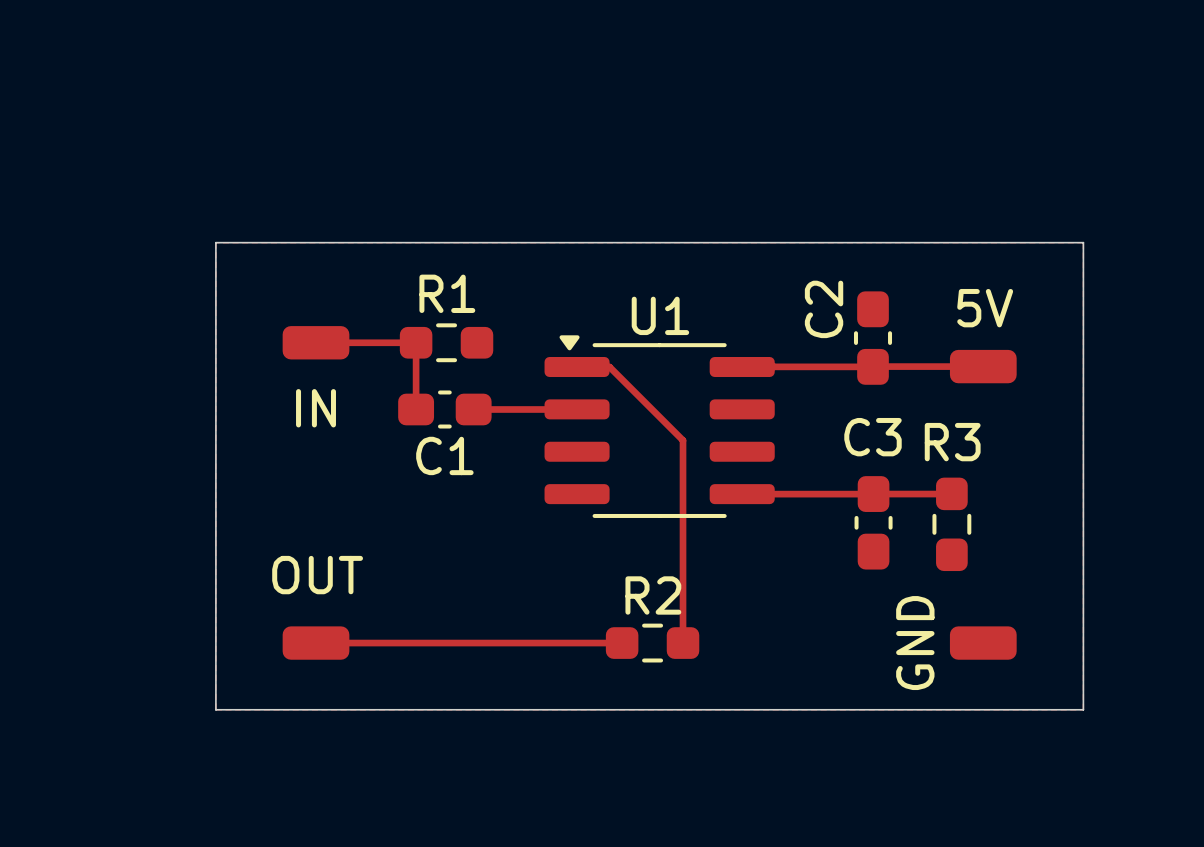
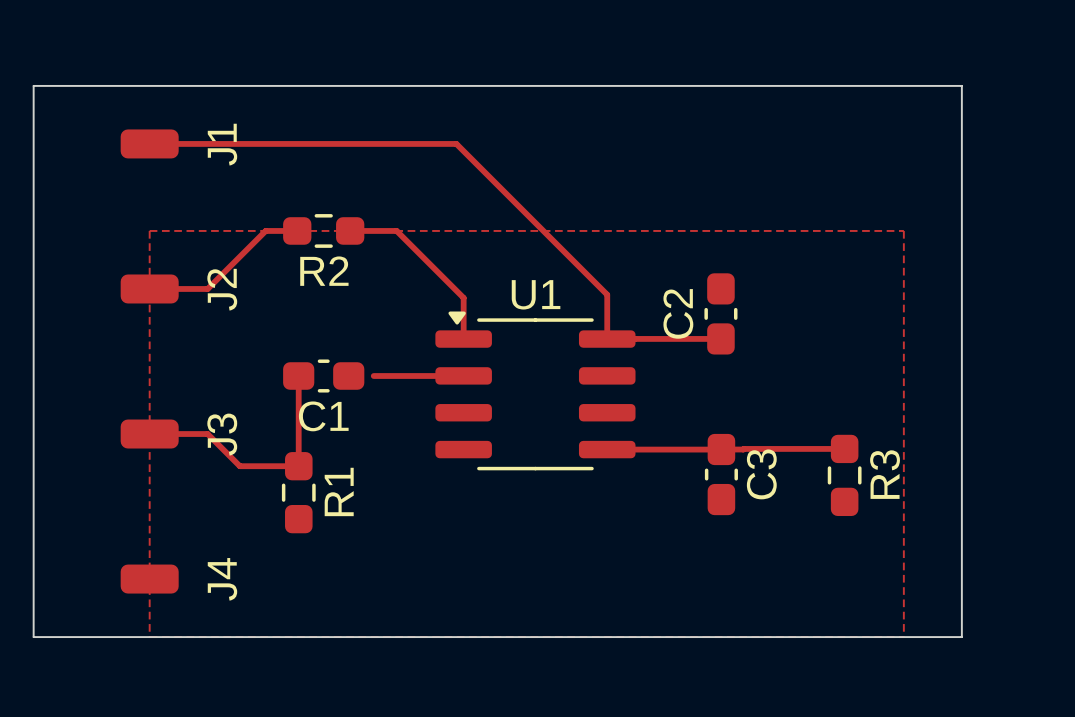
track: none -> (149, 143) (456, 143) (607, 294) (607, 339)
J1: none -> (149, 143)
track: none -> (297, 230) (265, 230) (207, 288) (149, 288)
J2: none -> (149, 288)
C2 name position: C2 (824, 309) -> C2 (678, 313)
track: (316, 342) (416, 342) (416, 409) -> none
IN: (316, 342) -> none
R1 rotation: 0° (446, 342) -> 90° clockwise (298, 492)
R1 position: (446, 342) -> (298, 492)
track: (874, 366) (983, 366) -> none
5V: (983, 366) -> none
track: (577, 367) (609, 367) (683, 440) (683, 643) -> (463, 339) (463, 297) (396, 230) (350, 230)
track: none -> (298, 376) (298, 466) (239, 466) (207, 434) (149, 434)
C1 position: (444, 409) -> (323, 376)
C3 name rotation: 0° (873, 437) -> 90° counterclockwise (761, 474)
C3 name position: C3 (873, 437) -> C3 (761, 474)
R3 name rotation: 0° (952, 442) -> 90° counterclockwise (885, 474)
R3 name position: R3 (952, 442) -> R3 (885, 474)
J3: none -> (149, 434)
track: (898, 494) (951, 494) -> (743, 449) (844, 448)
R3 position: (951, 524) -> (844, 475)
R2 name position: R2 (653, 595) -> R2 (324, 271)
J4: none -> (149, 579)
track: (316, 643) (622, 643) -> none
OUT: (316, 643) -> none
R2 position: (652, 643) -> (323, 230)
GND: (983, 643) -> none
board edge: (215, 709) (215, 242) (1083, 242) (1083, 709) -> (149, 637) (33, 637) (33, 85) (961, 85) (961, 637) (903, 637)

